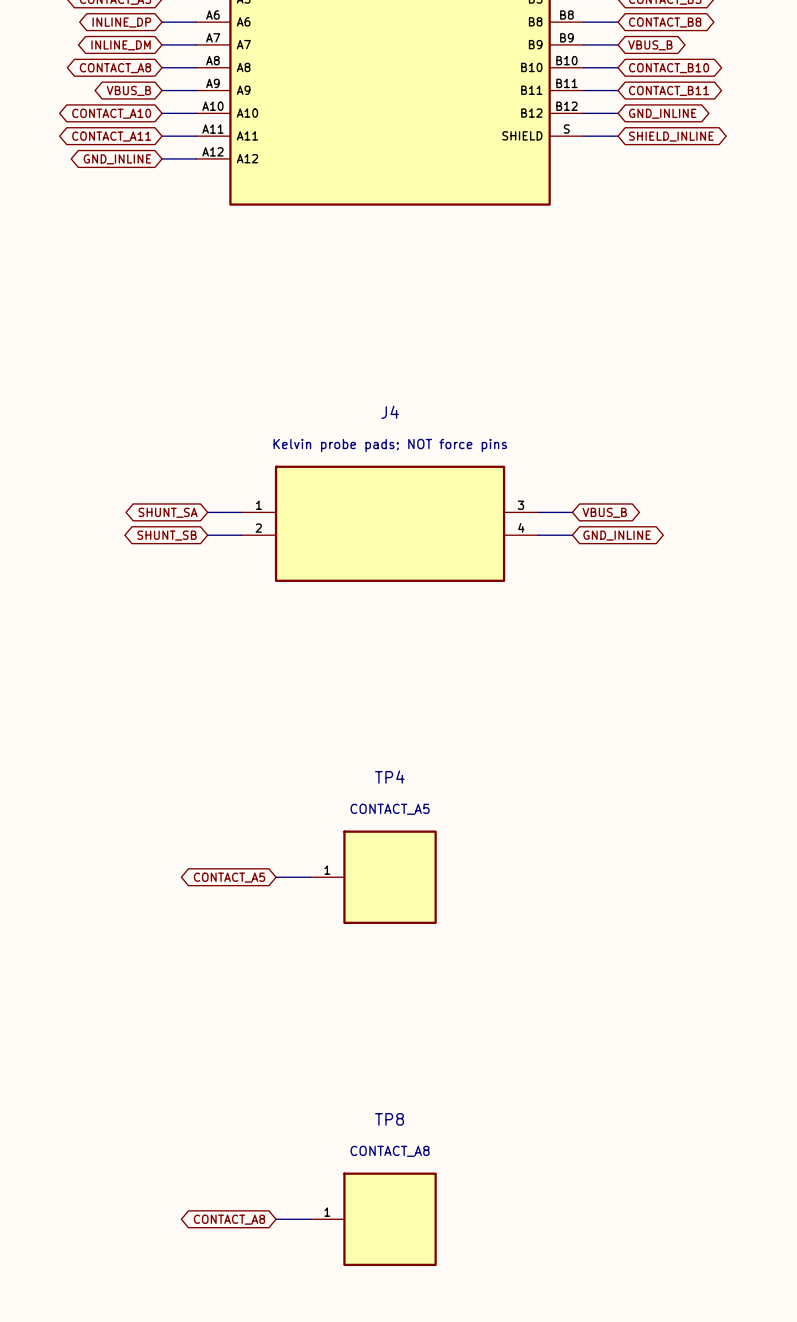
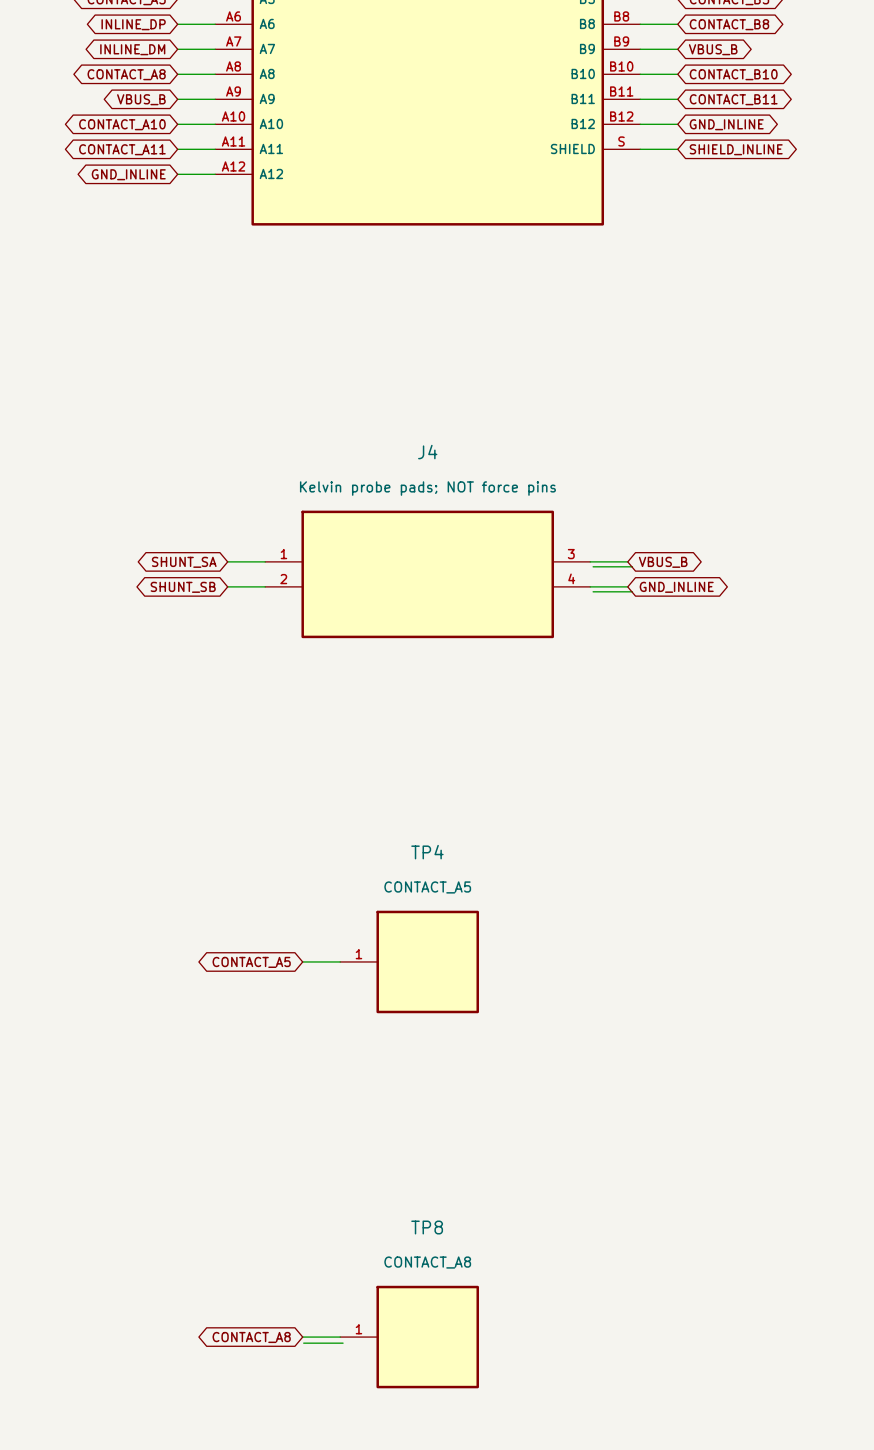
wire: none -> (593, 566) (632, 566)
wire: none -> (593, 591) (632, 591)
wire: none -> (303, 1343) (343, 1343)

